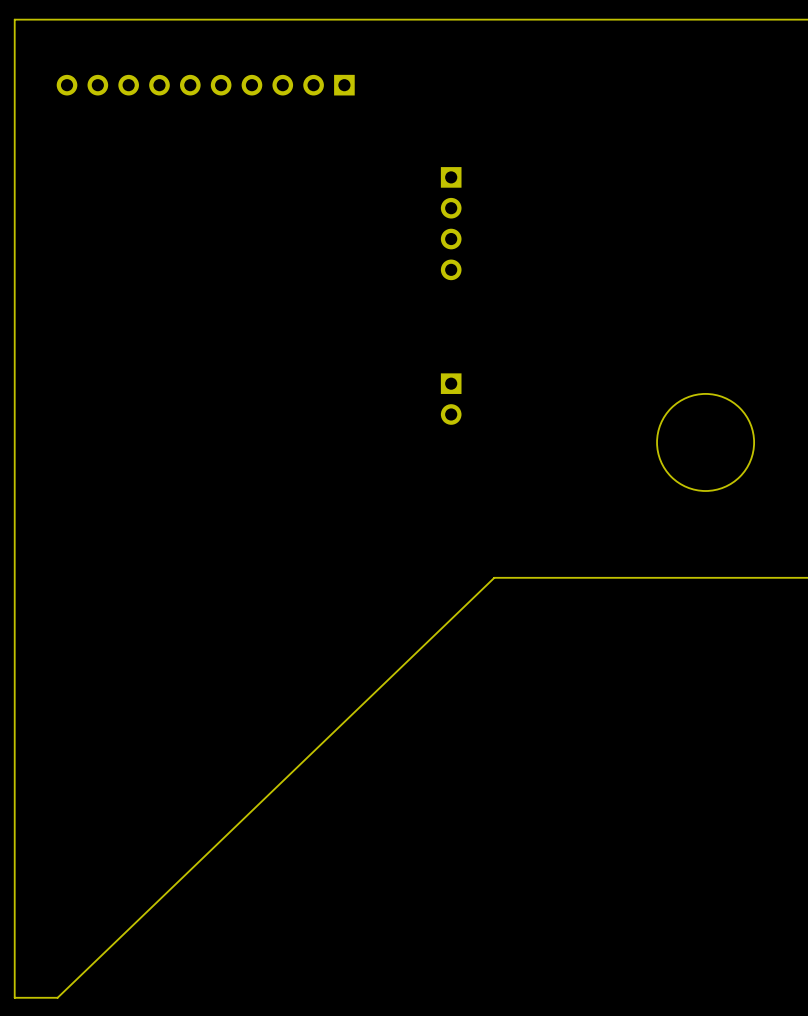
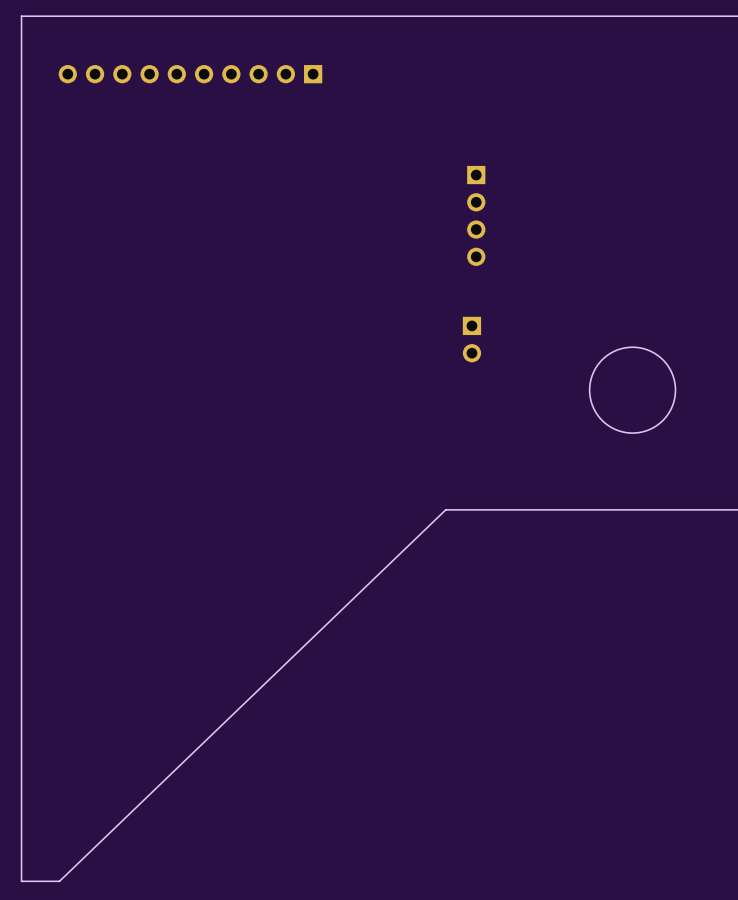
part position: (451, 223) -> (476, 215)
part position: (451, 399) -> (471, 339)

